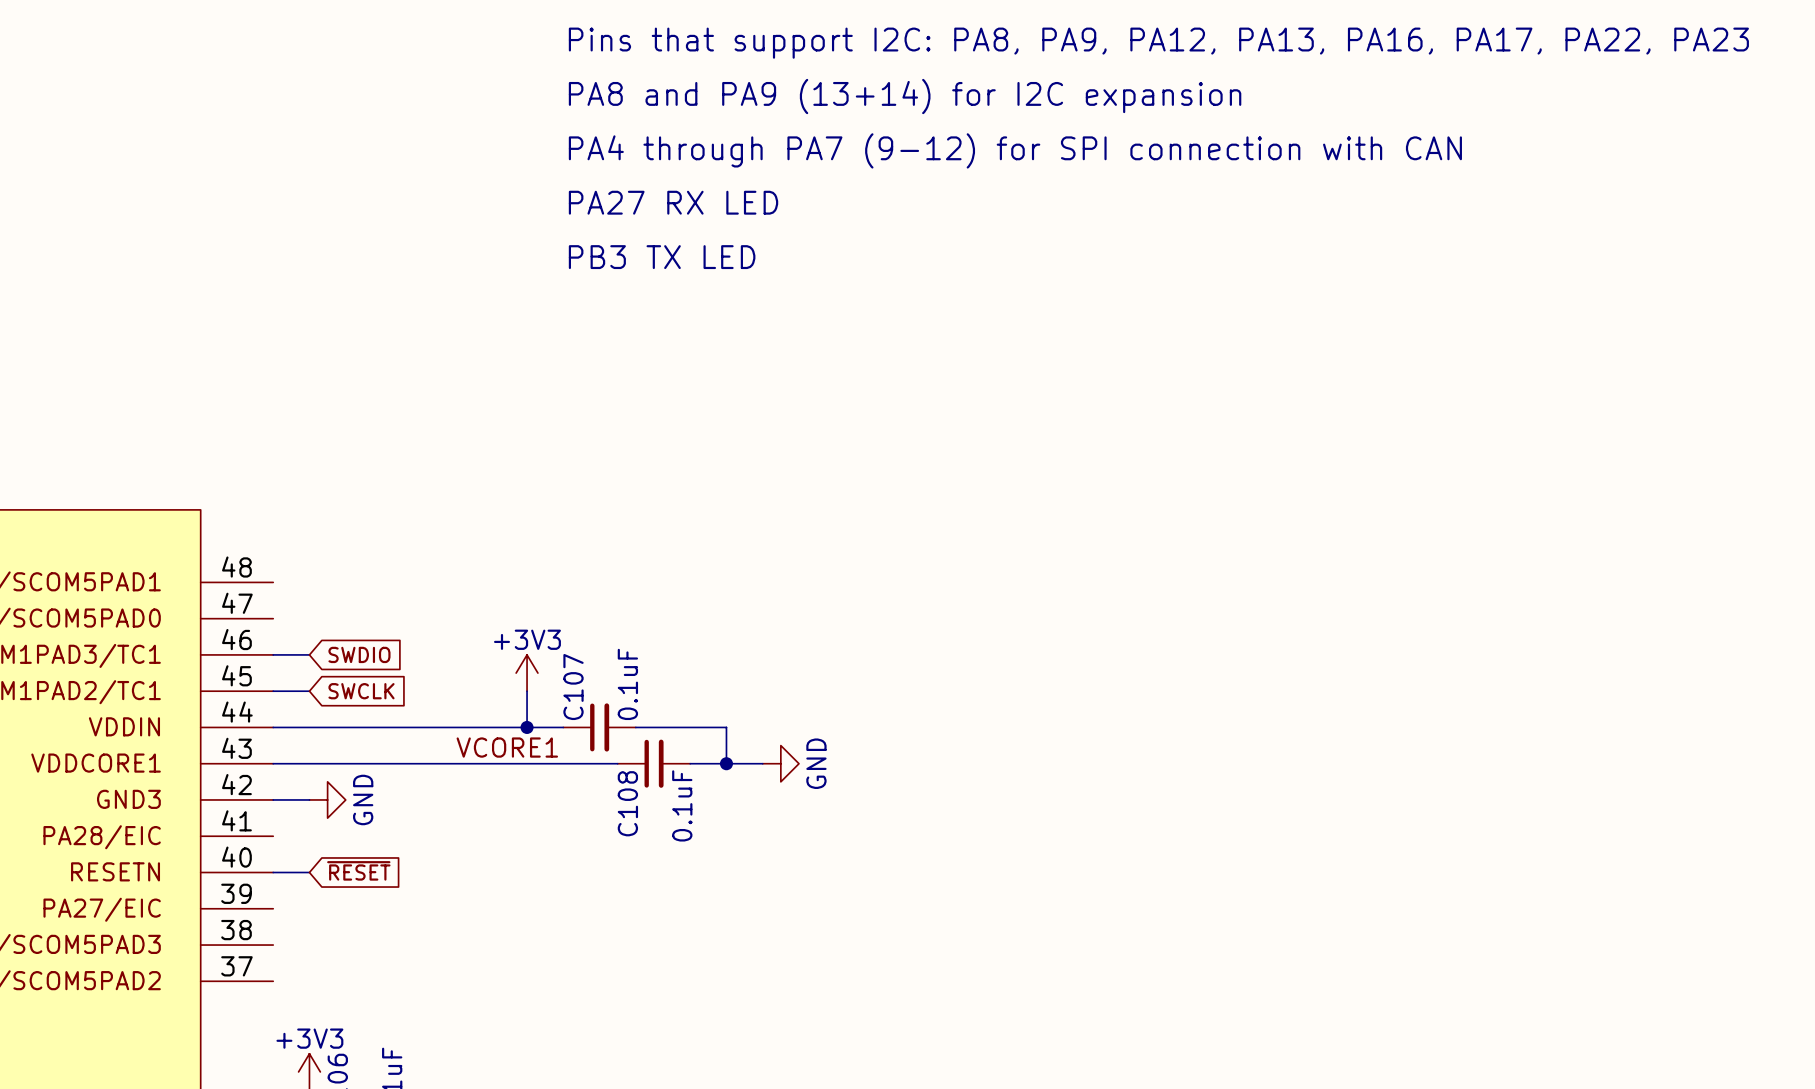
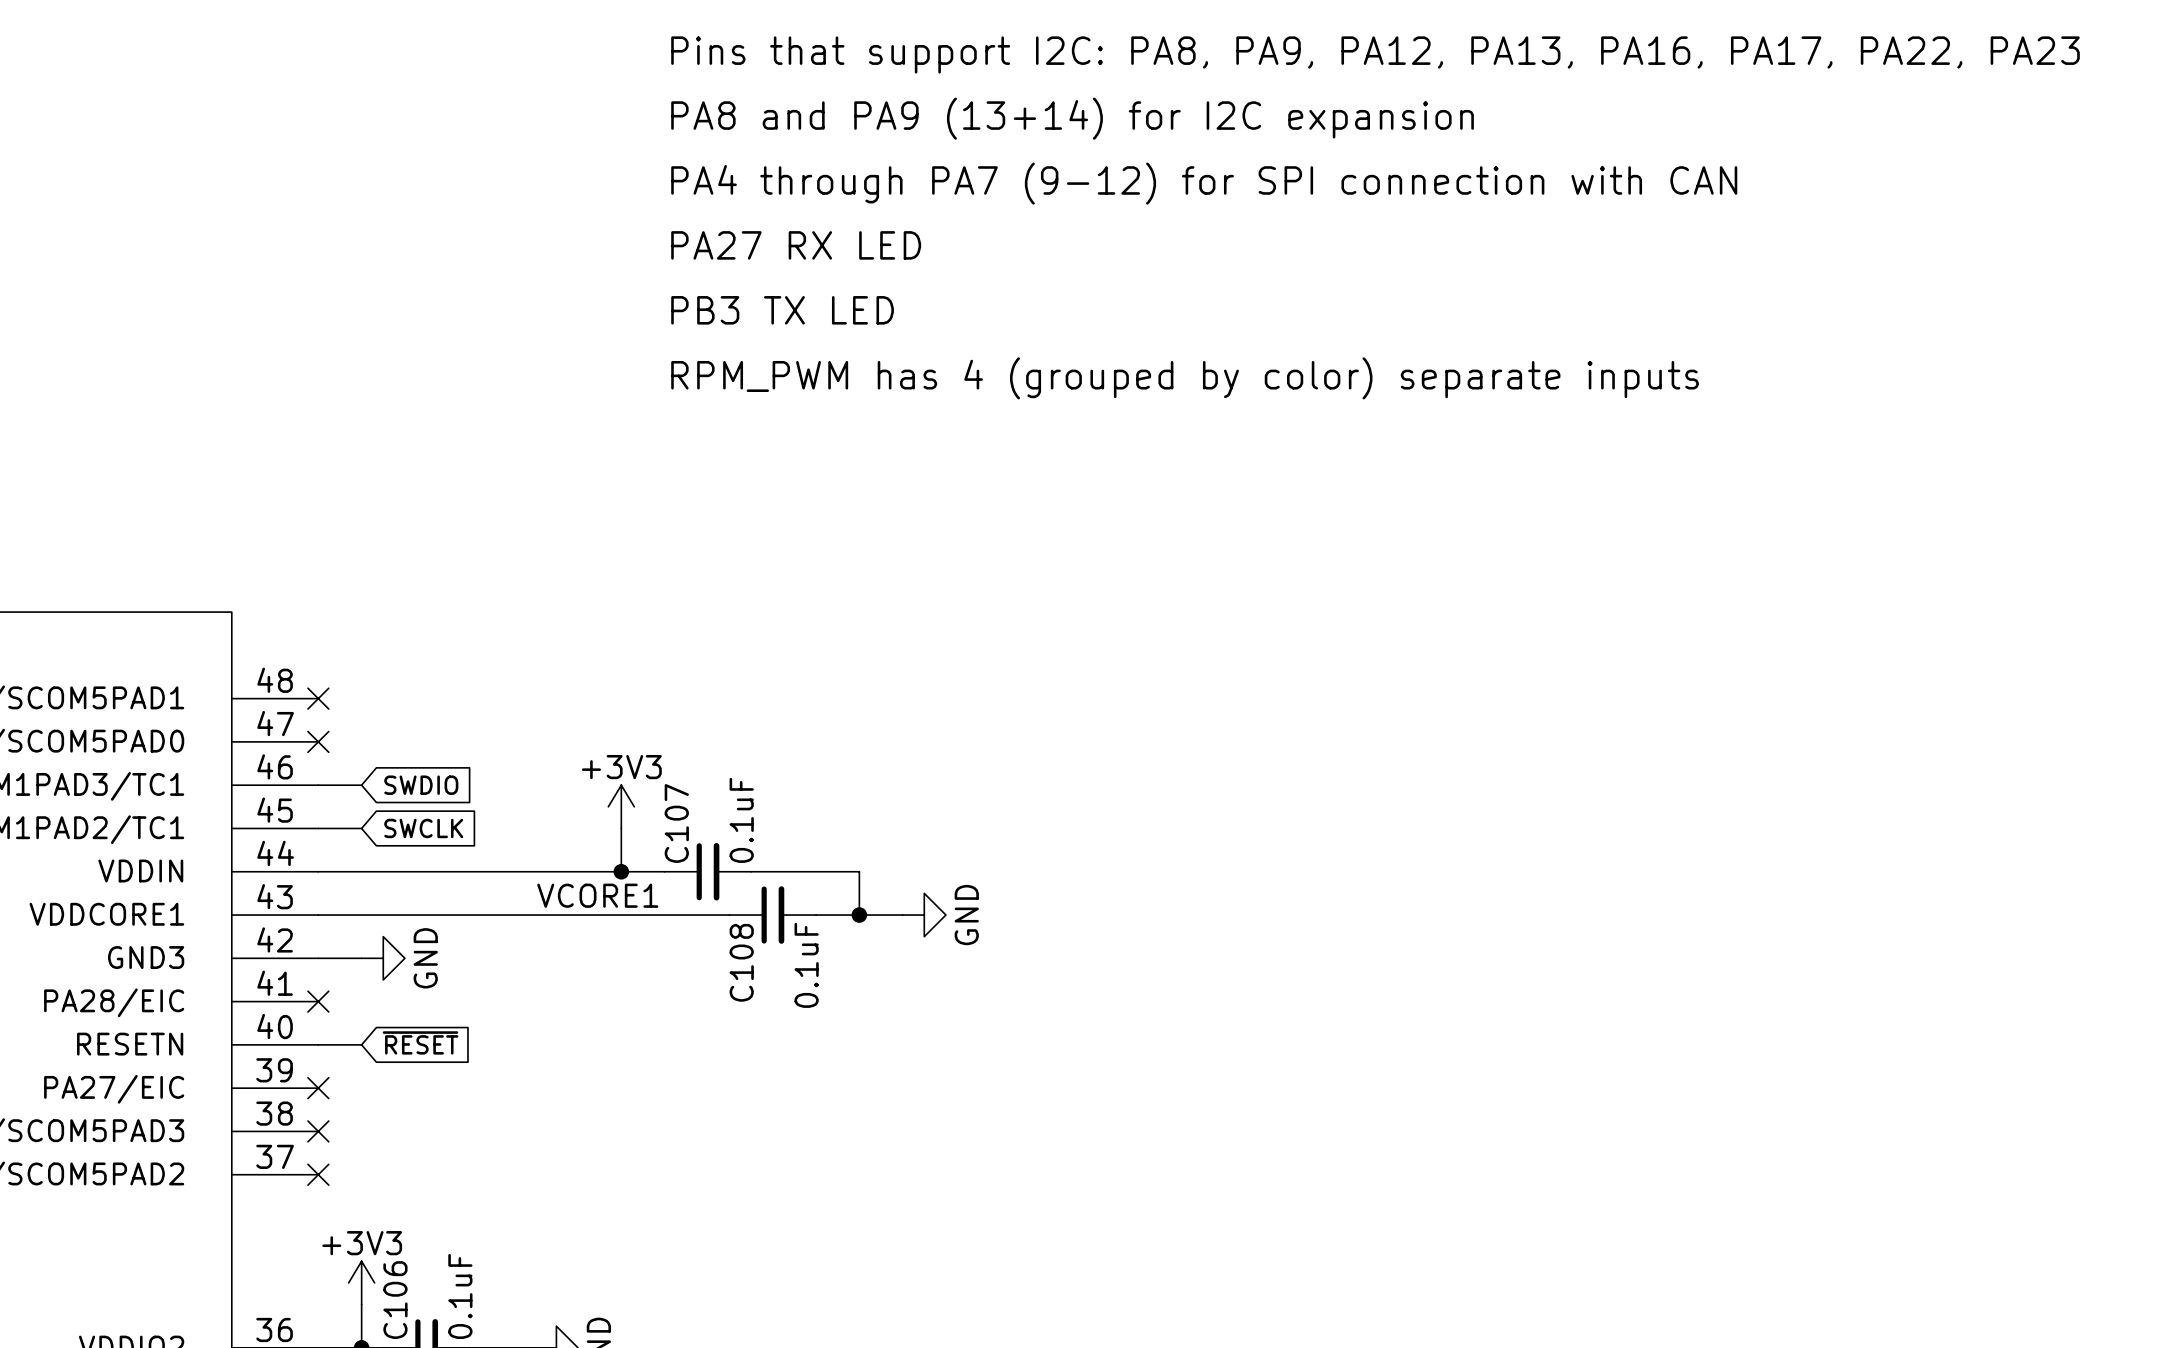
text: none -> RPM_PWM has 4 (grouped by color) separate inputs (1185, 378)
no-connect mark: none -> (318, 698)
no-connect mark: none -> (318, 741)
no-connect mark: none -> (318, 1001)
no-connect mark: none -> (318, 1088)
no-connect mark: none -> (318, 1131)
no-connect mark: none -> (318, 1174)

